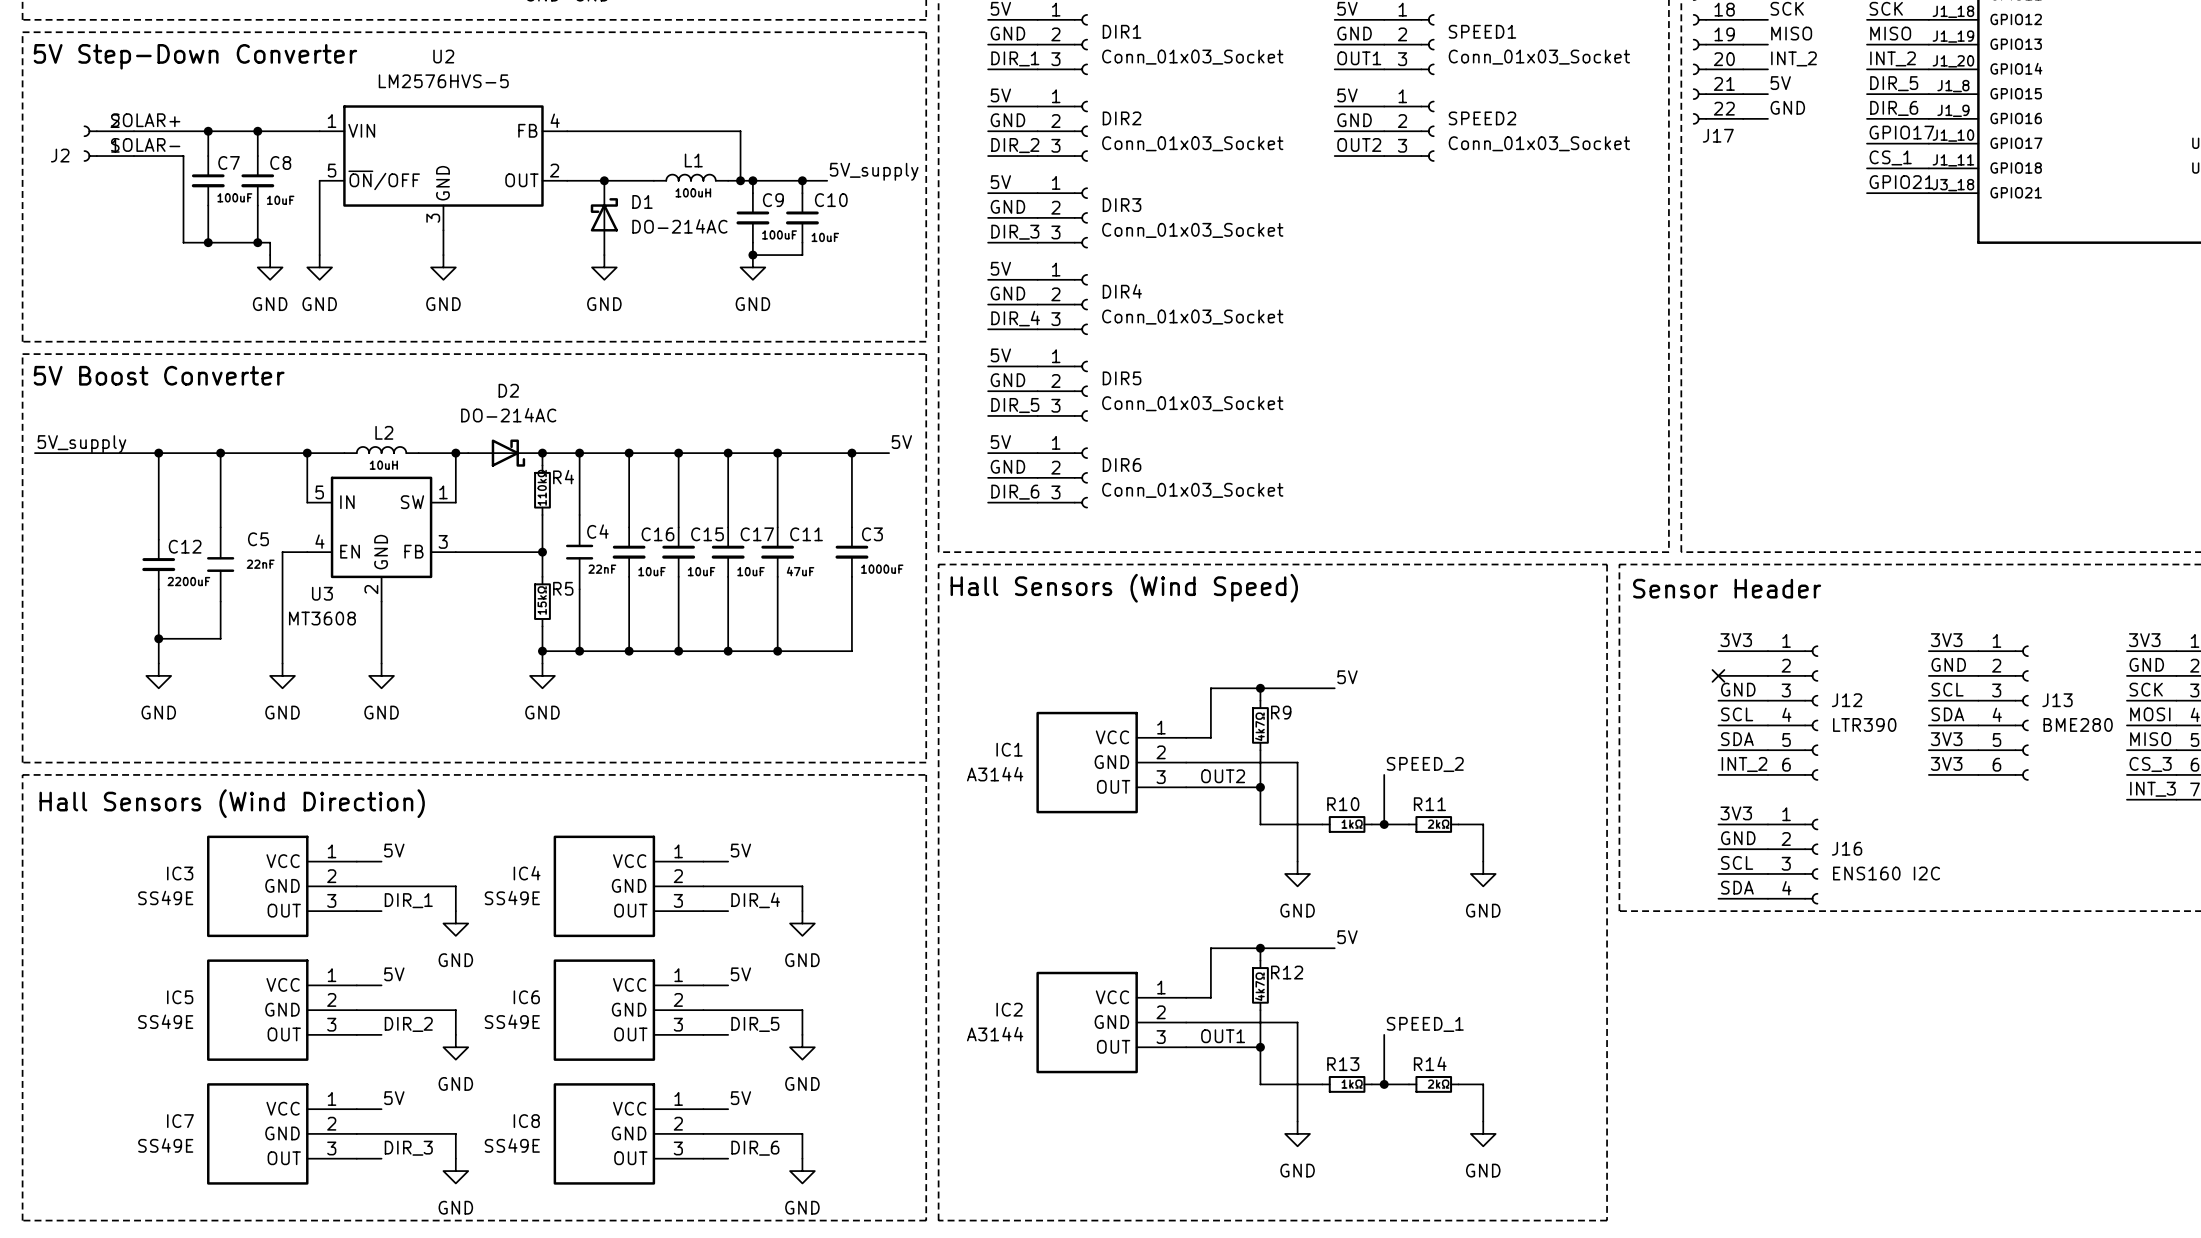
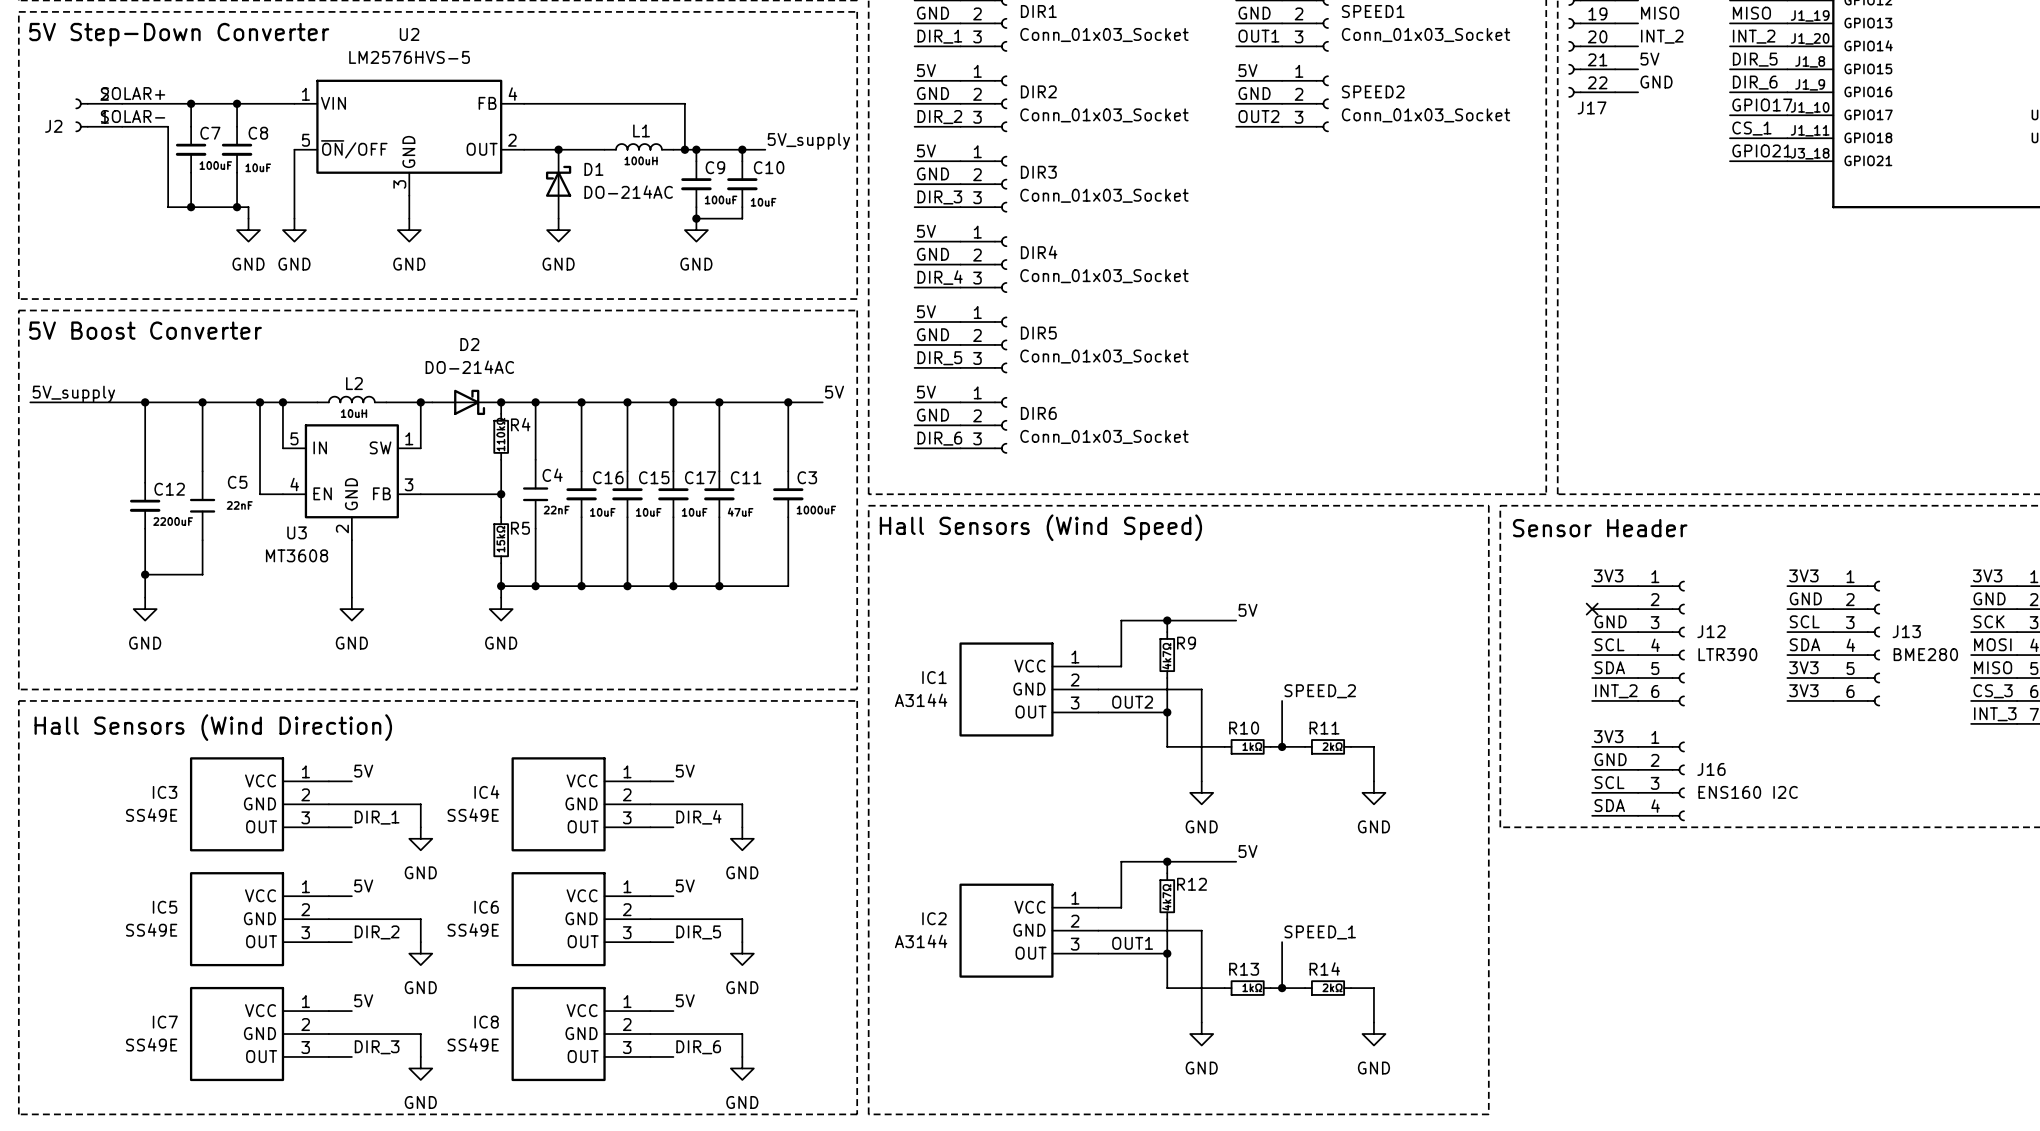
junction: none -> (260, 402)
wire: (282, 552) (282, 663) -> (260, 494) (260, 402)
power symbol: GND (282, 675) -> none

